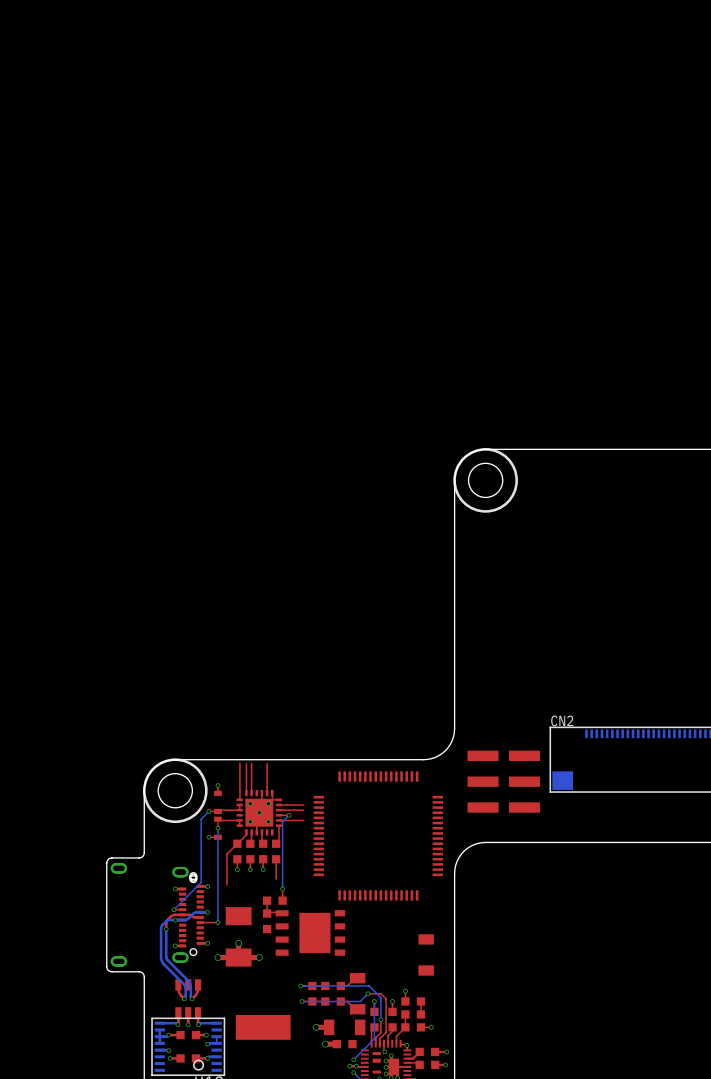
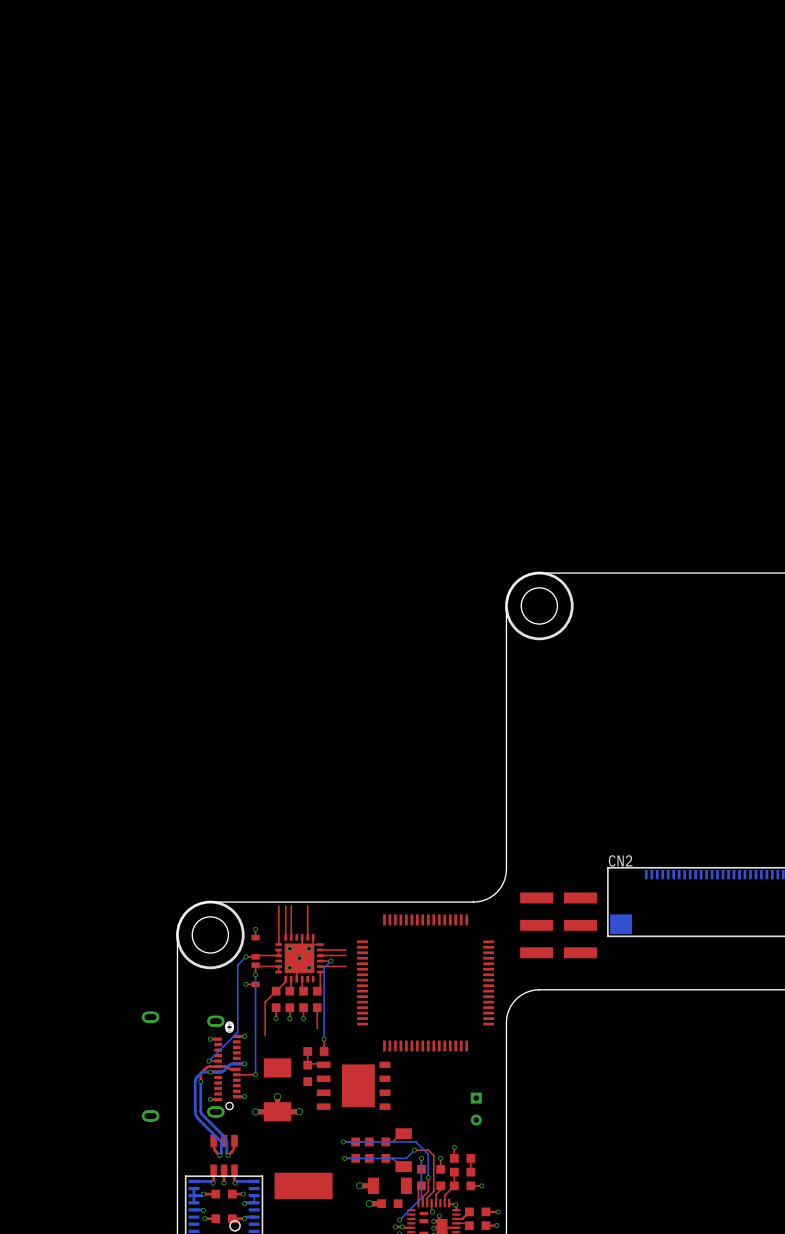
board edge: (144, 852) (140, 857) (111, 858) (106, 863) (106, 967) (111, 971) (140, 971) (144, 976) -> (177, 1000) (177, 1132)
part footprint: [418, 934, 434, 976] -> [470, 1092, 482, 1126]

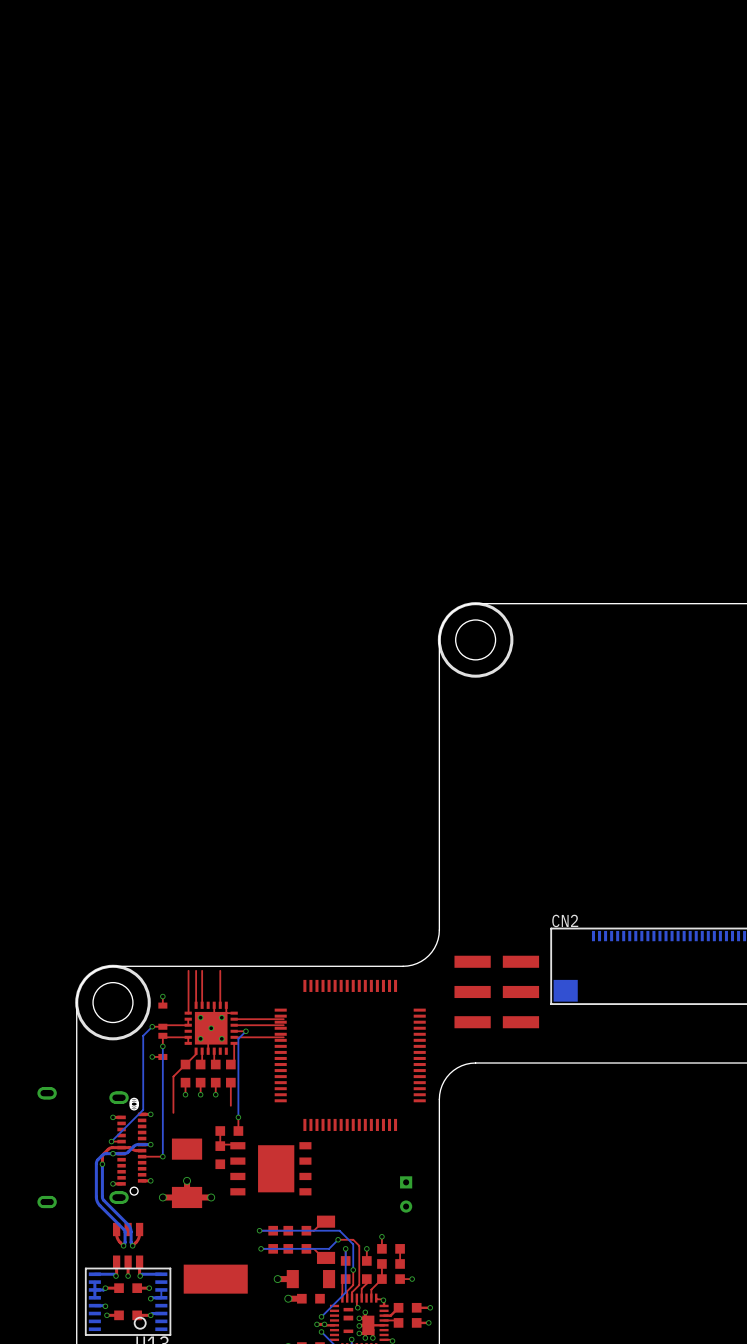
top track: none -> (283, 1019) (262, 1019)
top track: none -> (283, 1025) (262, 1025)
top track: none -> (283, 1037) (262, 1037)

